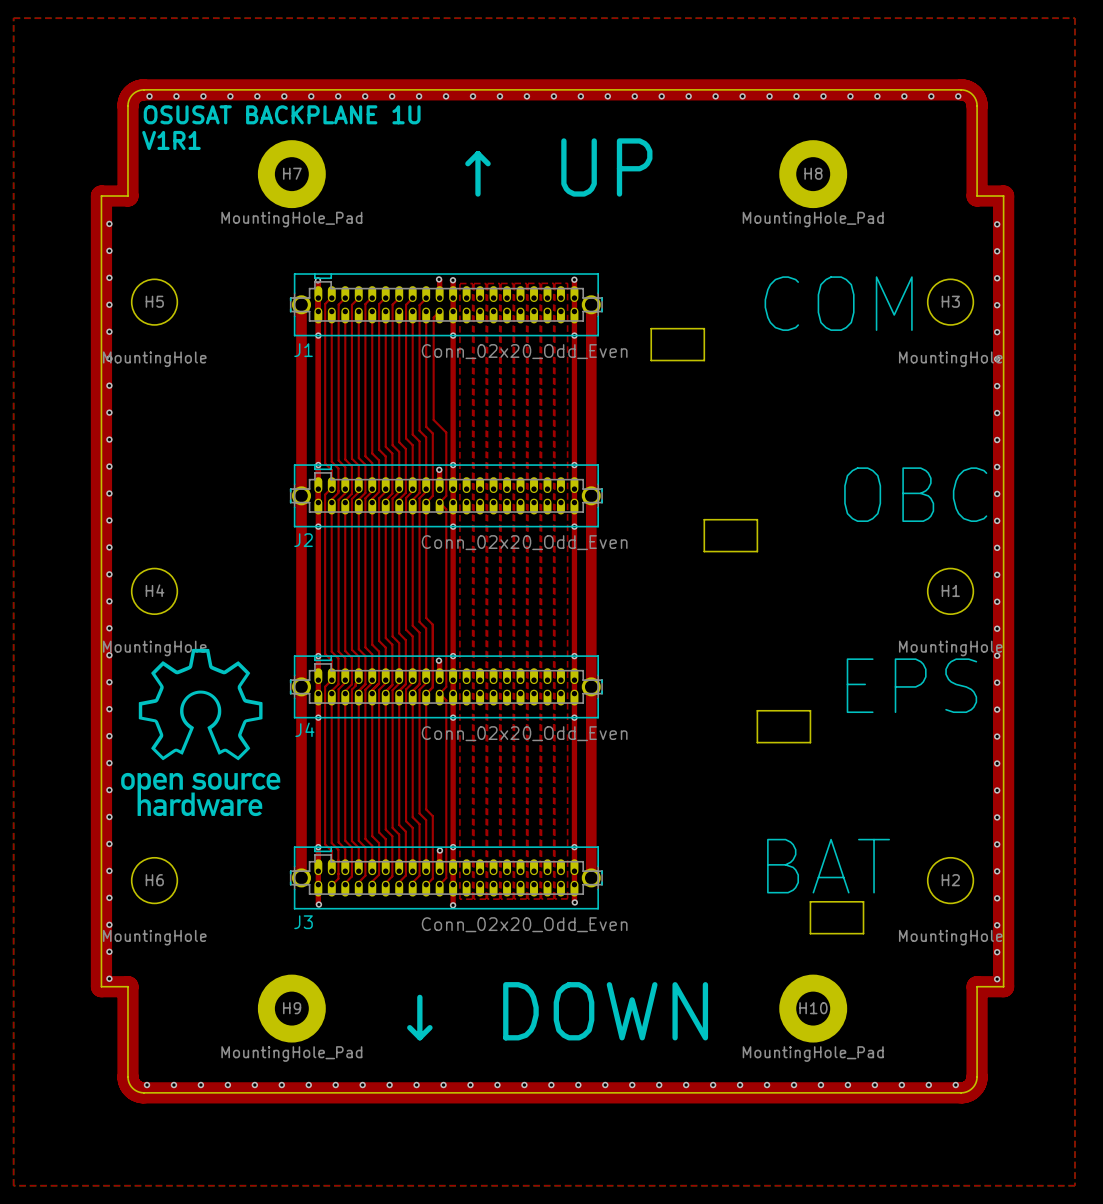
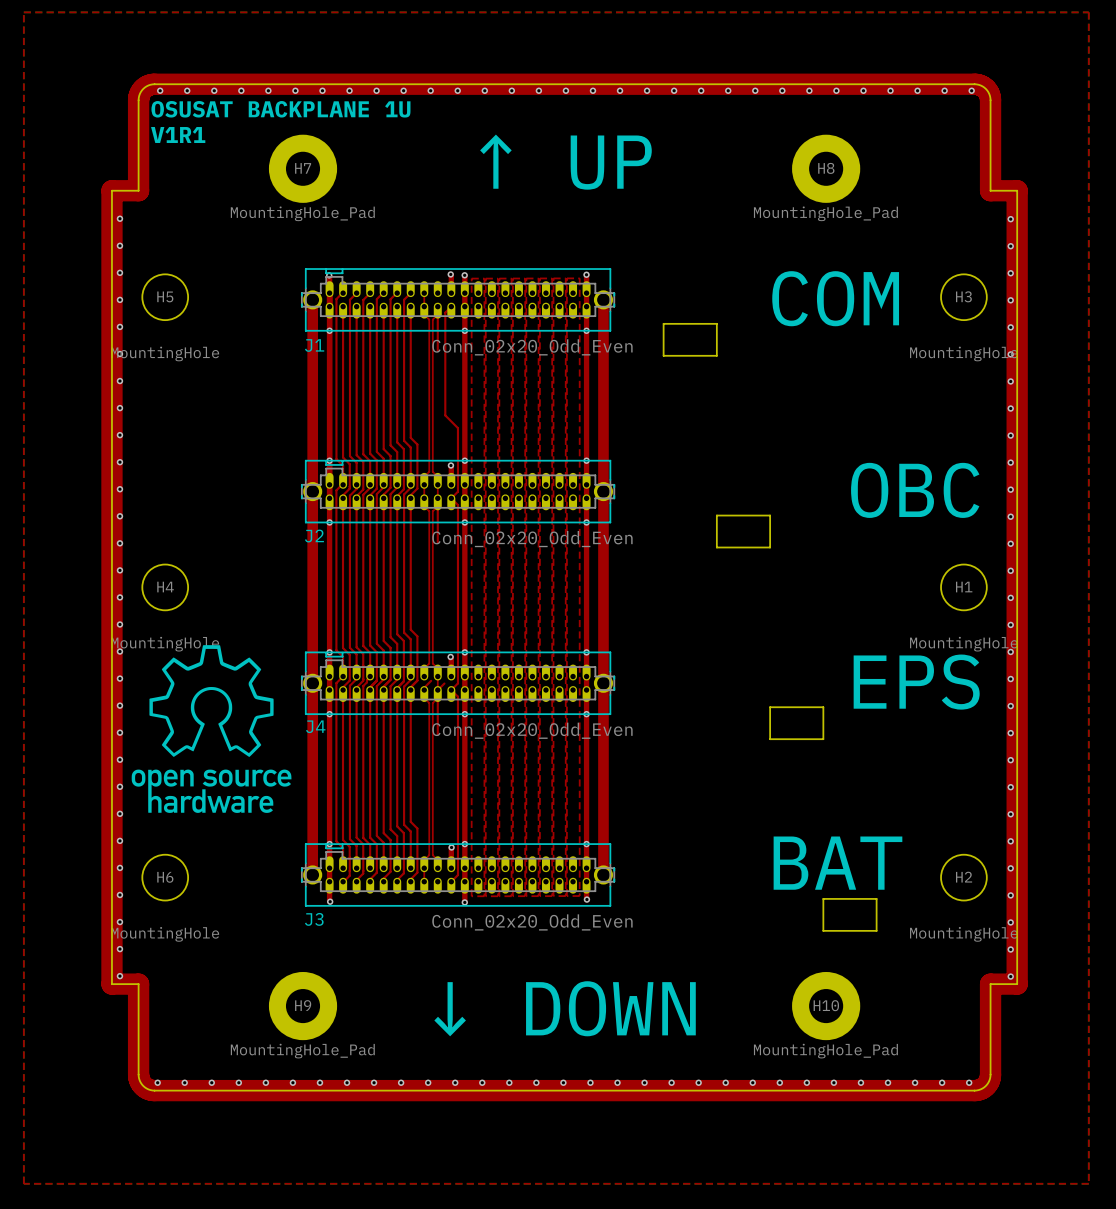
top track: (412, 298) (406, 304) (406, 438) (412, 445) (412, 481) -> (424, 293) (424, 306)
top track: (426, 298) (419, 305) (419, 430) (426, 437) (426, 481) -> (437, 314) (432, 319) (432, 471) (437, 476)
top track: (412, 319) (412, 434) (419, 441) (419, 492) (412, 499) -> (424, 314) (429, 319) (429, 471) (424, 476)
top track: (426, 355) (426, 426) (432, 433) (432, 495) (426, 502) -> (437, 487) (437, 498)
top track: (412, 491) (406, 497) (406, 629) (412, 636) (412, 672) -> (424, 487) (424, 495)
top track: (426, 491) (419, 498) (419, 621) (426, 628) (426, 672) -> (437, 506) (432, 511) (432, 663) (437, 668)
top track: (412, 510) (412, 625) (419, 632) (419, 684) (412, 691) -> (424, 506) (429, 511) (429, 663) (424, 668)
top track: (426, 546) (426, 618) (432, 624) (432, 687) (426, 694) -> (437, 676) (437, 690)
top track: (412, 682) (406, 689) (406, 821) (412, 827) (412, 863) -> (424, 698) (429, 703) (429, 855) (424, 860)
top track: (426, 683) (419, 689) (419, 813) (426, 820) (426, 863) -> (437, 698) (432, 703) (432, 855) (437, 860)
top track: (412, 701) (412, 817) (419, 824) (419, 875) (412, 882) -> (424, 868) (424, 879)
top track: (426, 738) (426, 809) (432, 816) (432, 878) (426, 885) -> none

